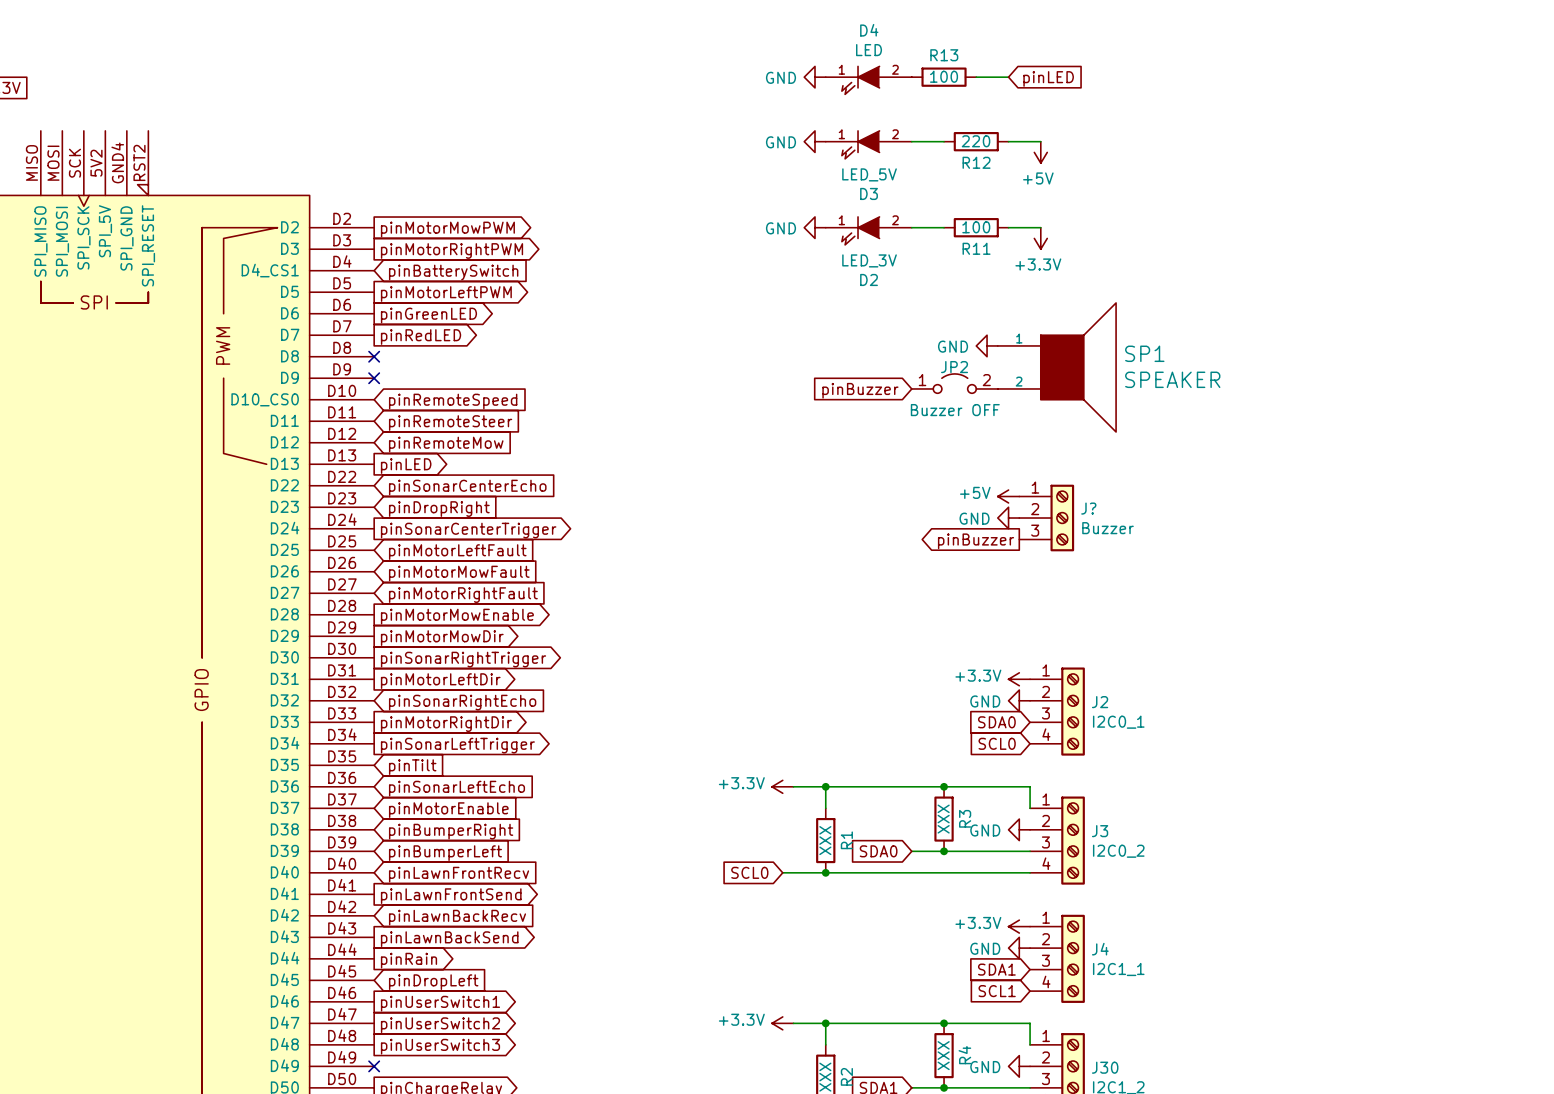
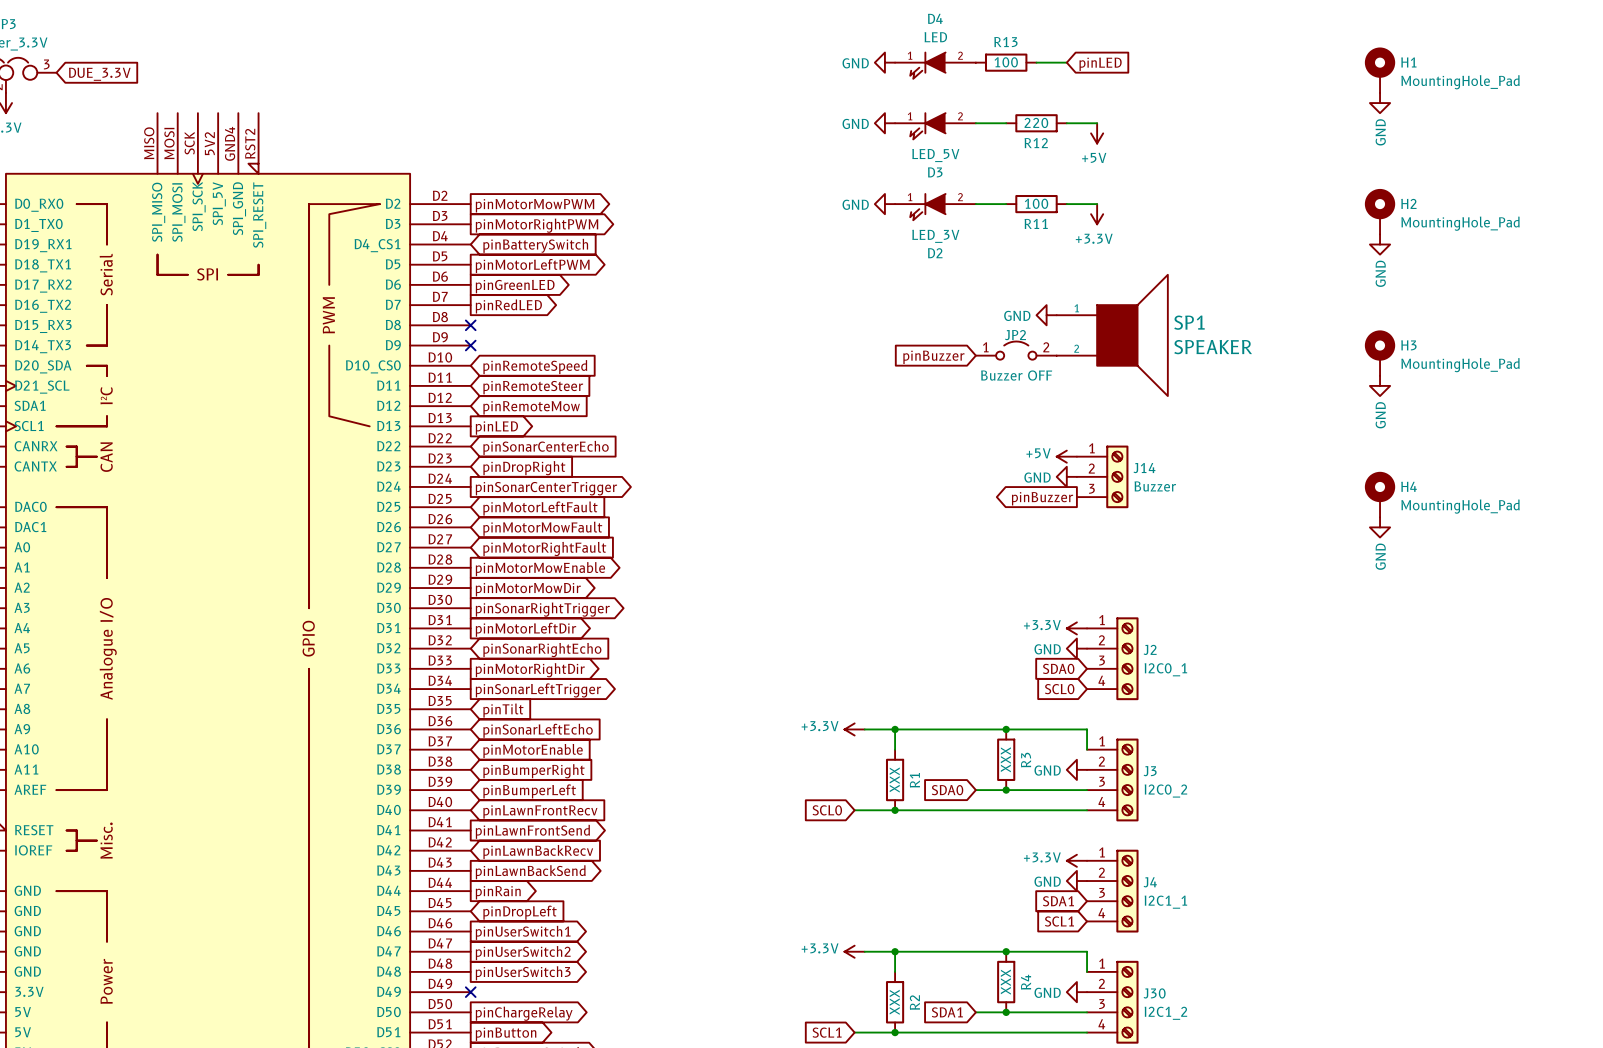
H1: none -> MountingHole_Pad (1380, 70)
power symbol: none -> GND (1380, 103)
H2: none -> MountingHole_Pad (1380, 211)
power symbol: none -> GND (1380, 244)
H3: none -> MountingHole_Pad (1380, 353)
power symbol: none -> GND (1380, 385)
J? name: J? (1088, 508) -> J14 (1144, 468)
H4: none -> MountingHole_Pad (1380, 494)
power symbol: none -> GND (1380, 527)

